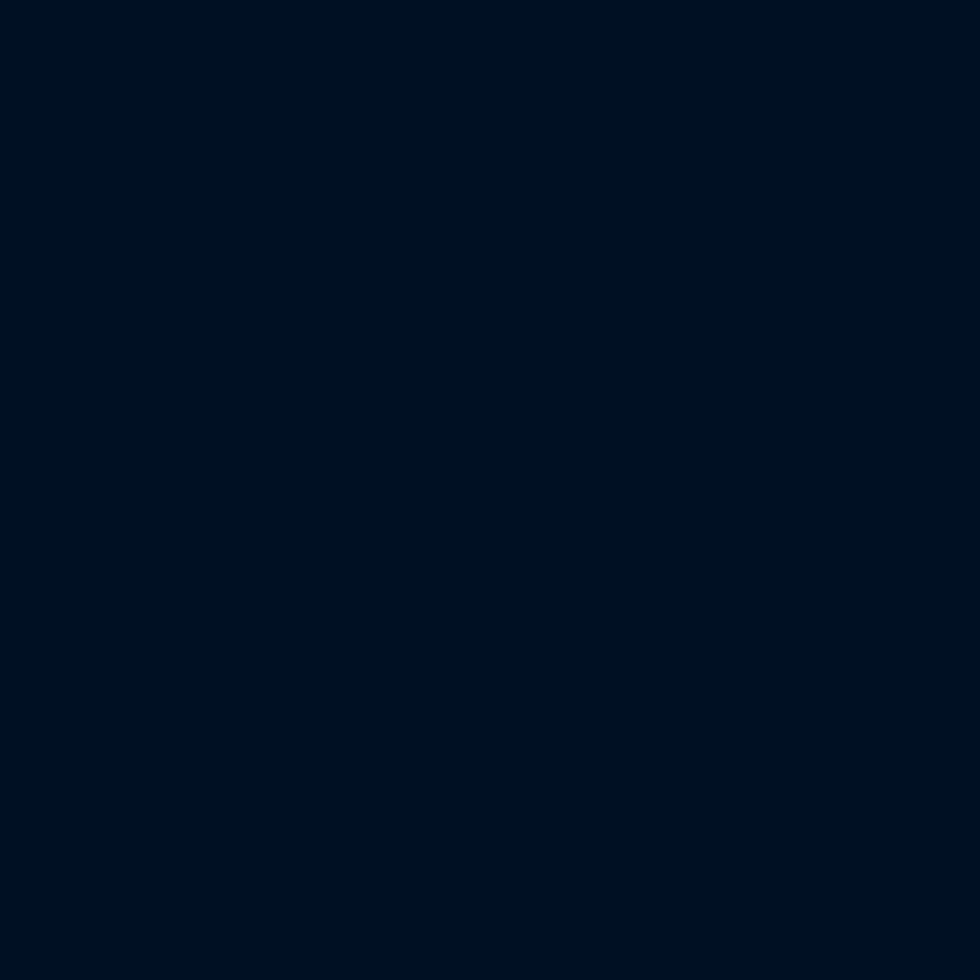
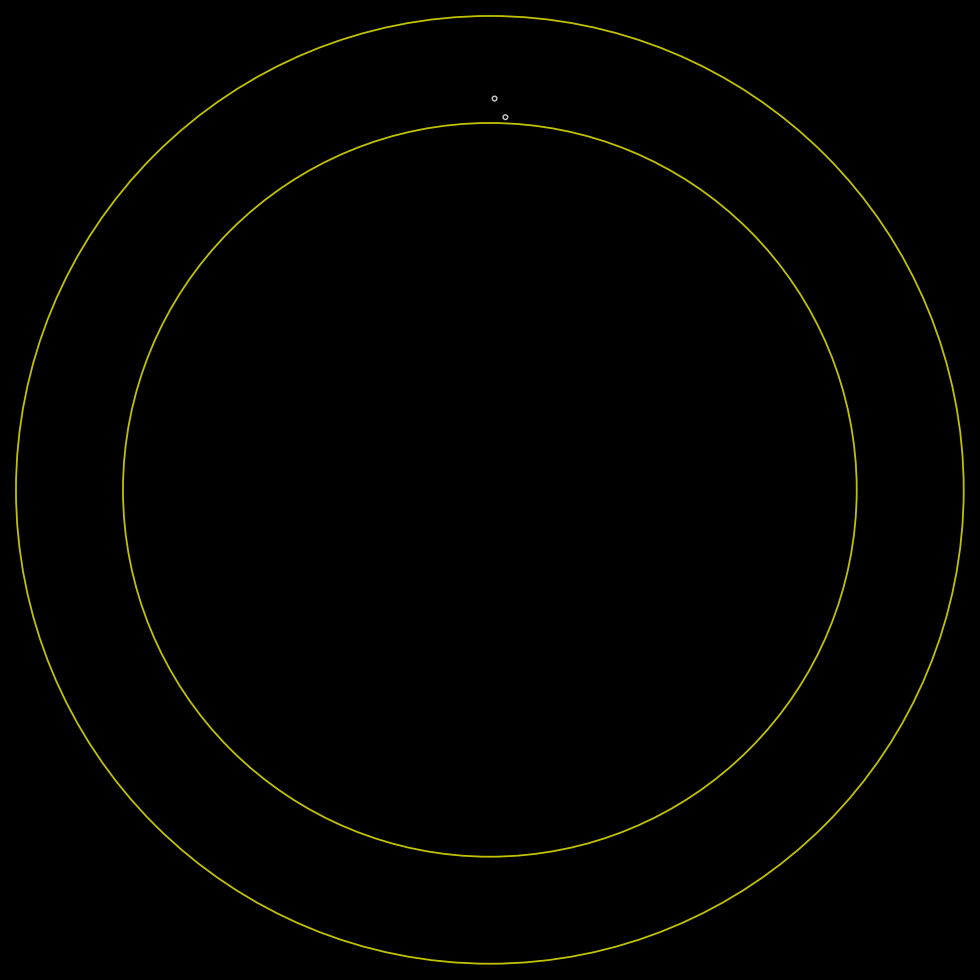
round board edge: none -> [15, 15, 964, 964]
via: none -> (494, 98)
via: none -> (505, 117)
round board edge: none -> [122, 122, 857, 857]

